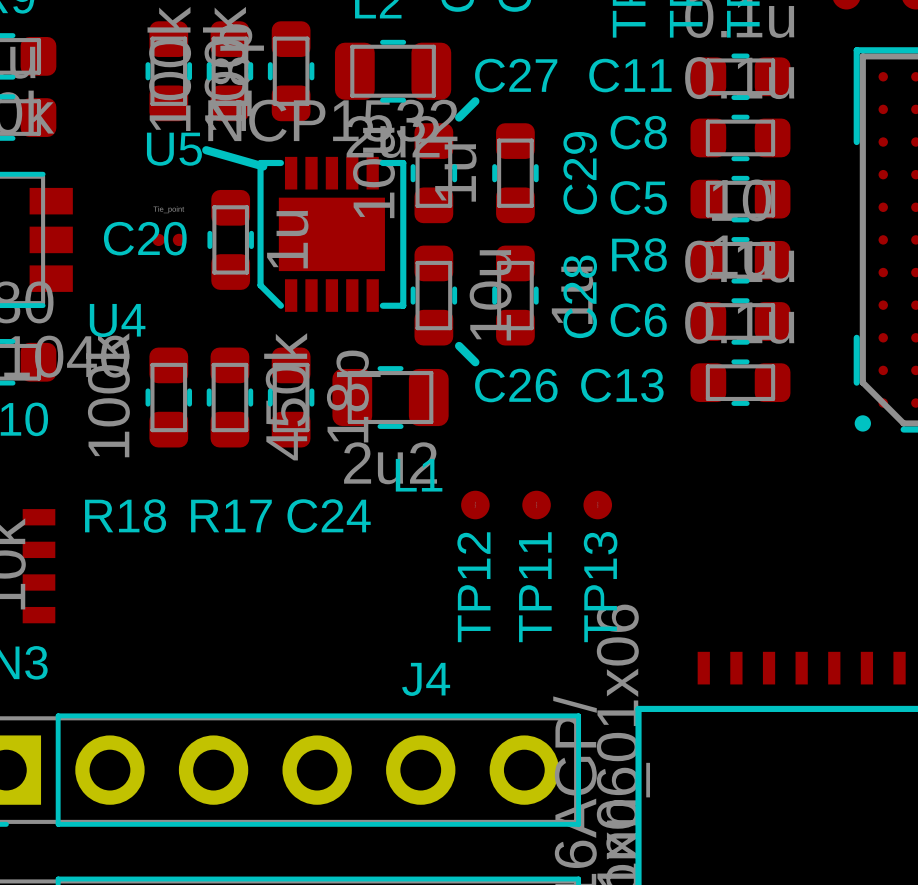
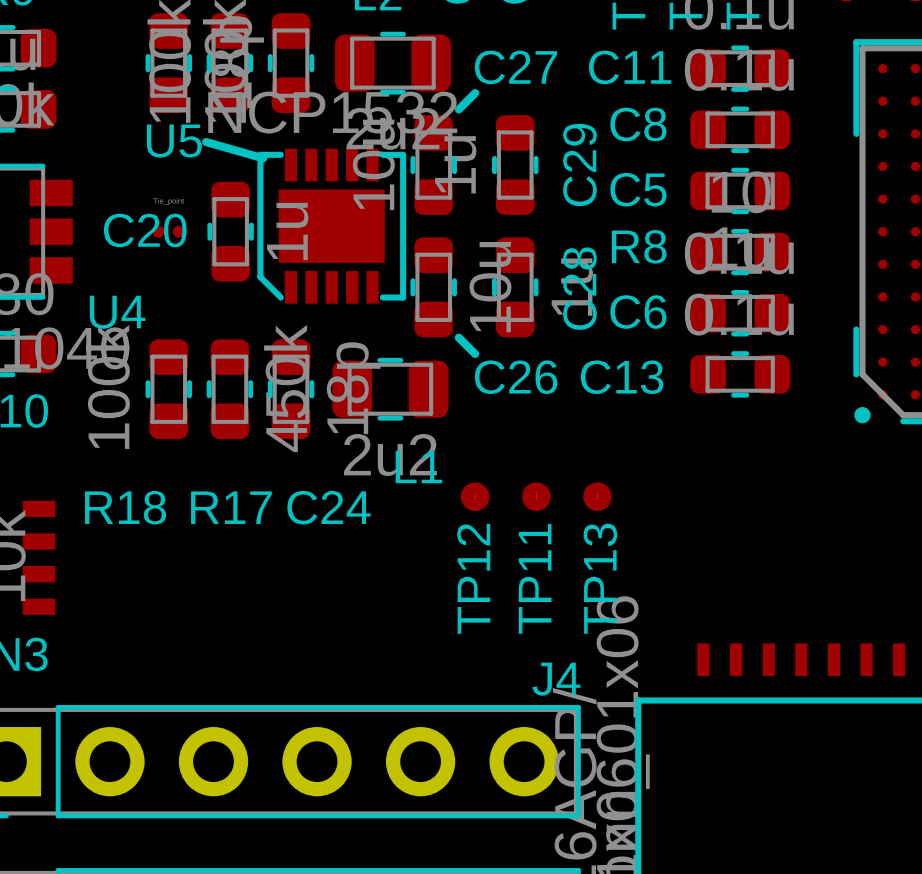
J4 name position: J4 (426, 679) -> J4 (556, 679)

